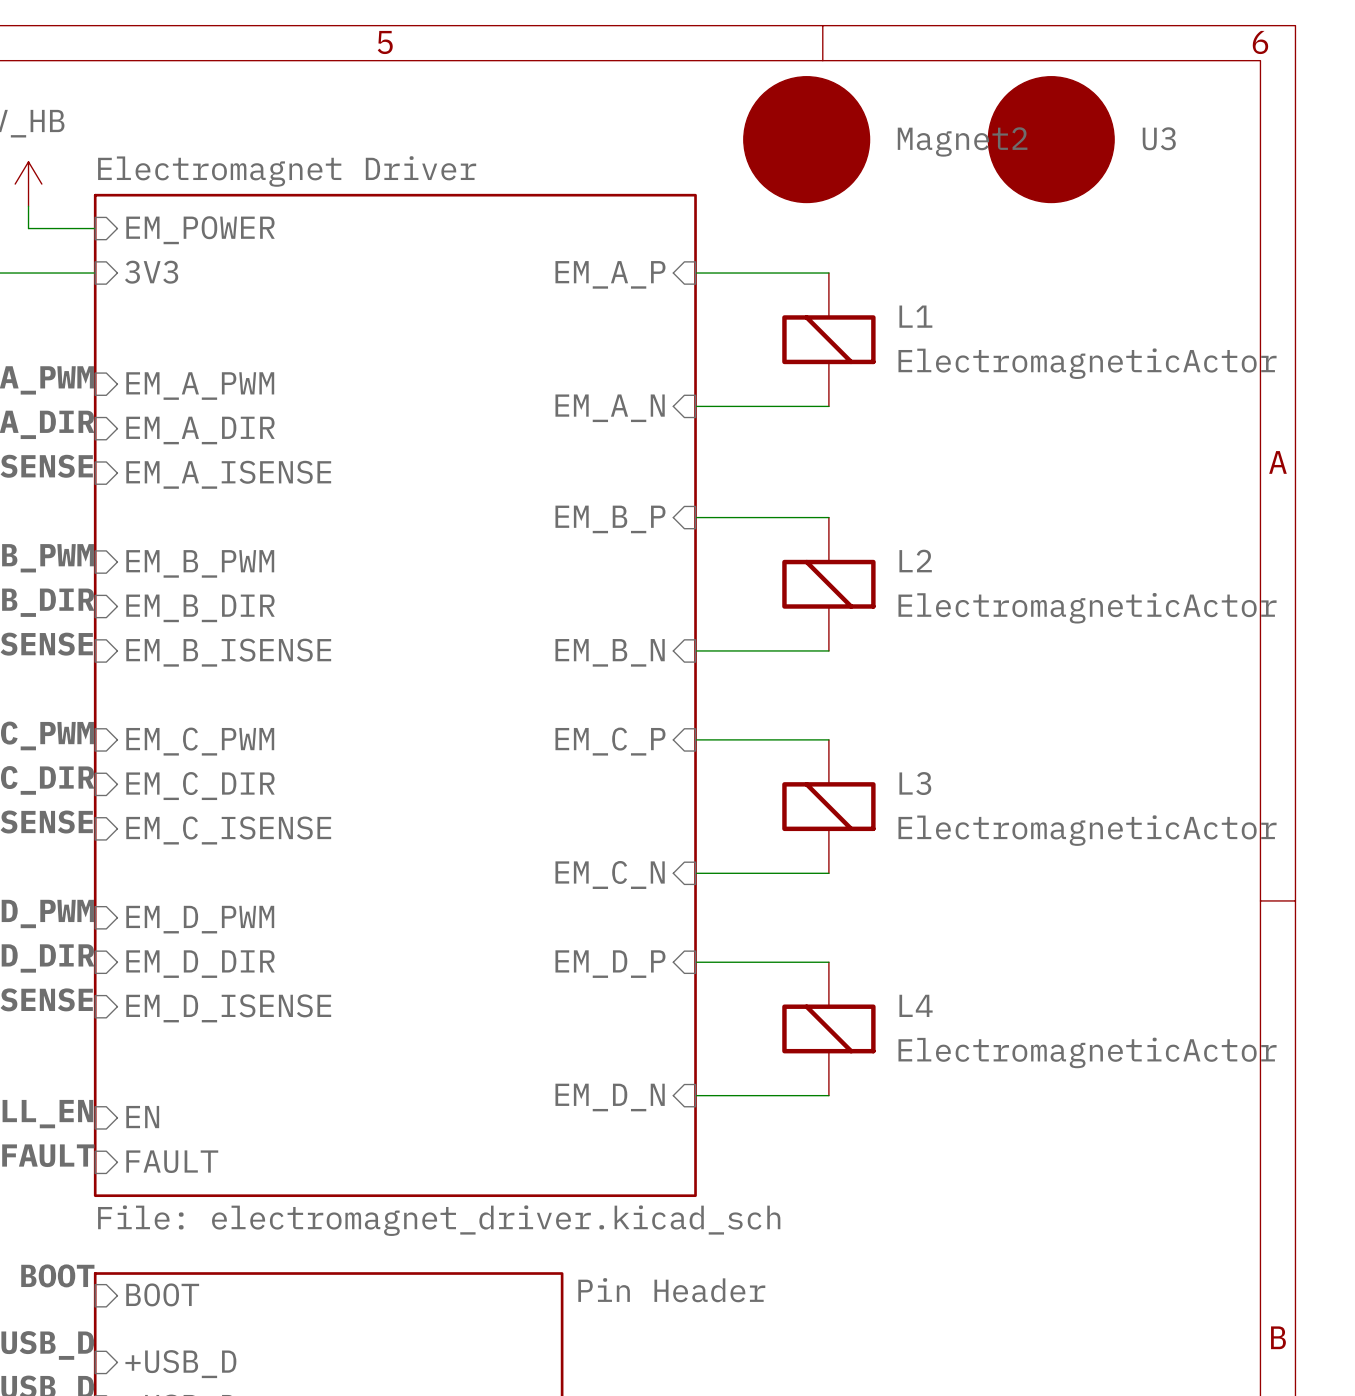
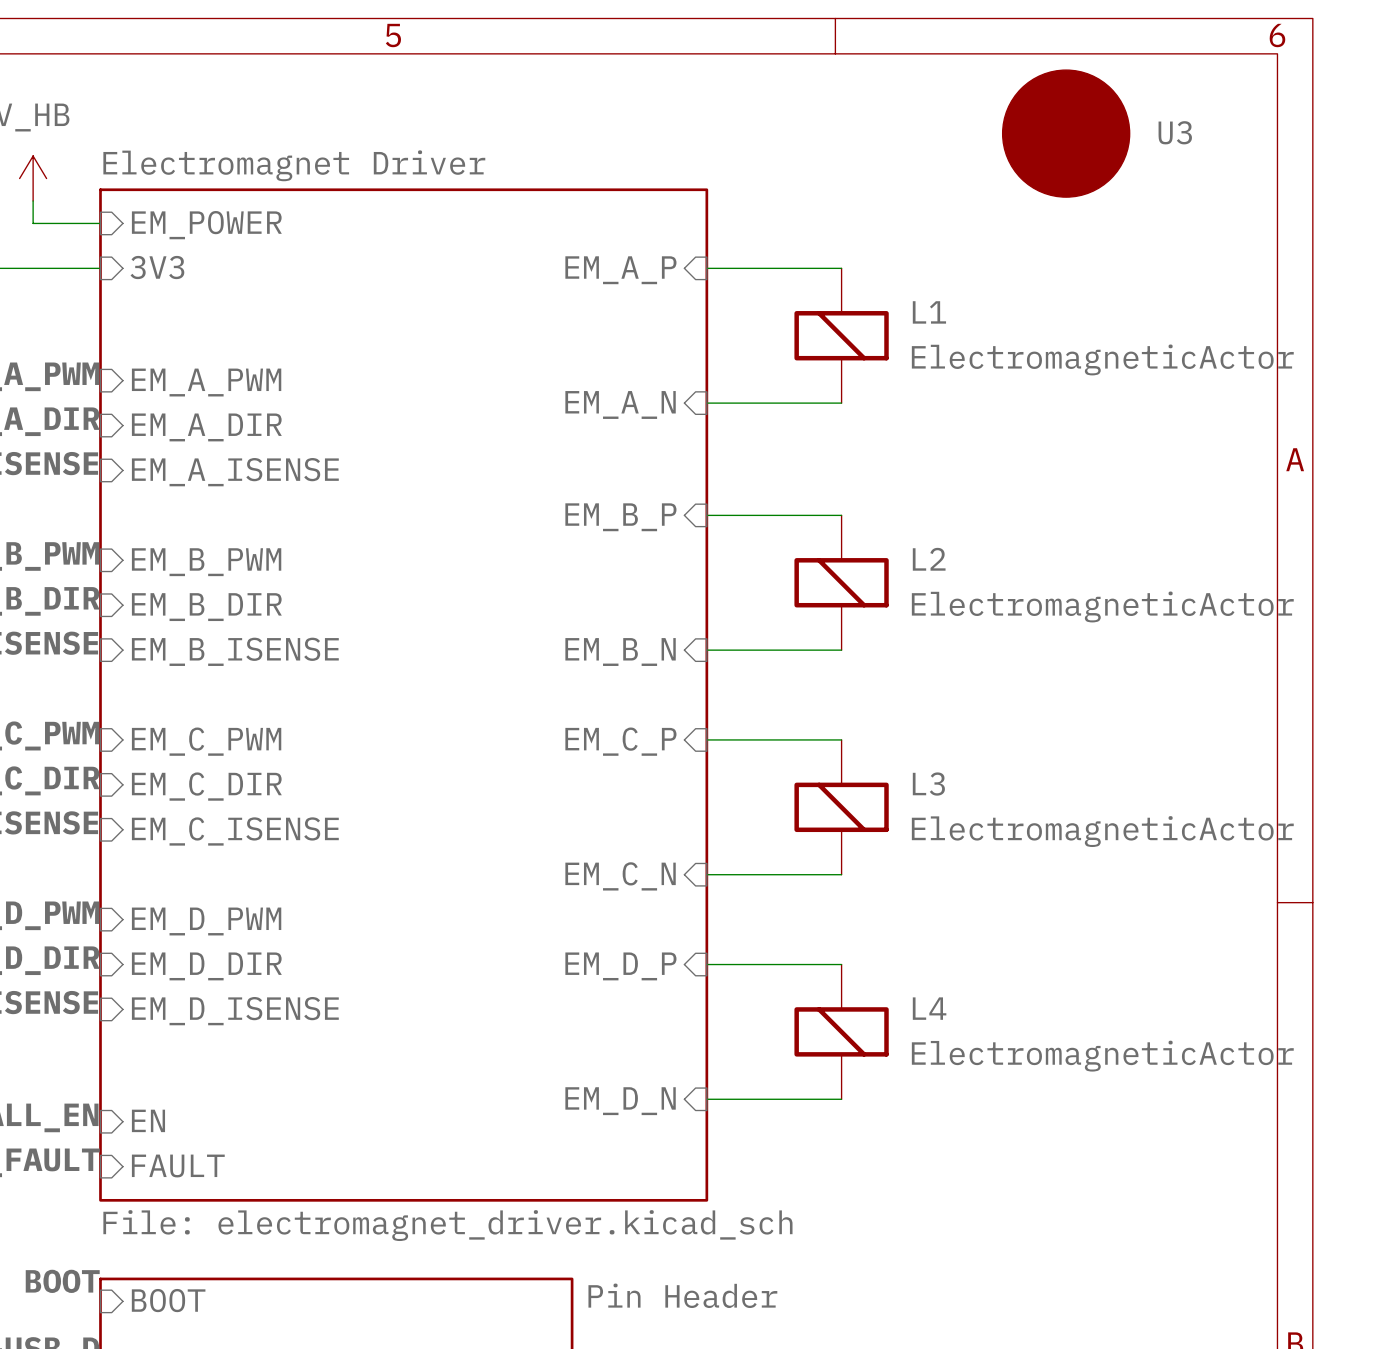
Magnet2: (806, 139) -> none

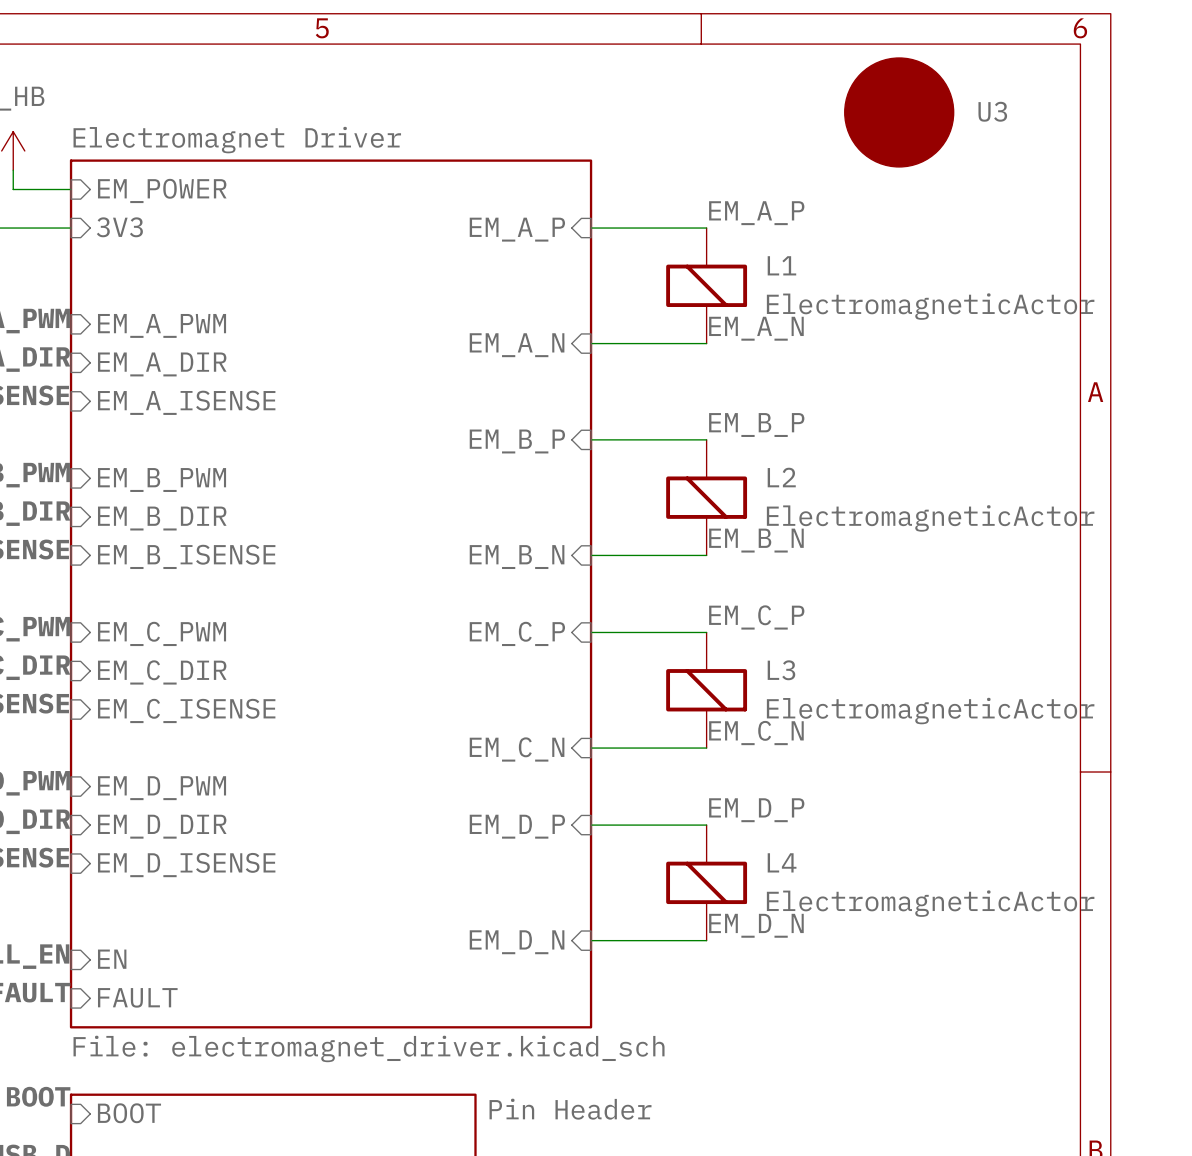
label: none -> EM_A_P (756, 213)
label: none -> EM_A_N (756, 328)
label: none -> EM_B_P (756, 425)
label: none -> EM_B_N (756, 540)
label: none -> EM_C_P (756, 617)
label: none -> EM_C_N (756, 733)
label: none -> EM_D_P (756, 810)
label: none -> EM_D_N (756, 925)

